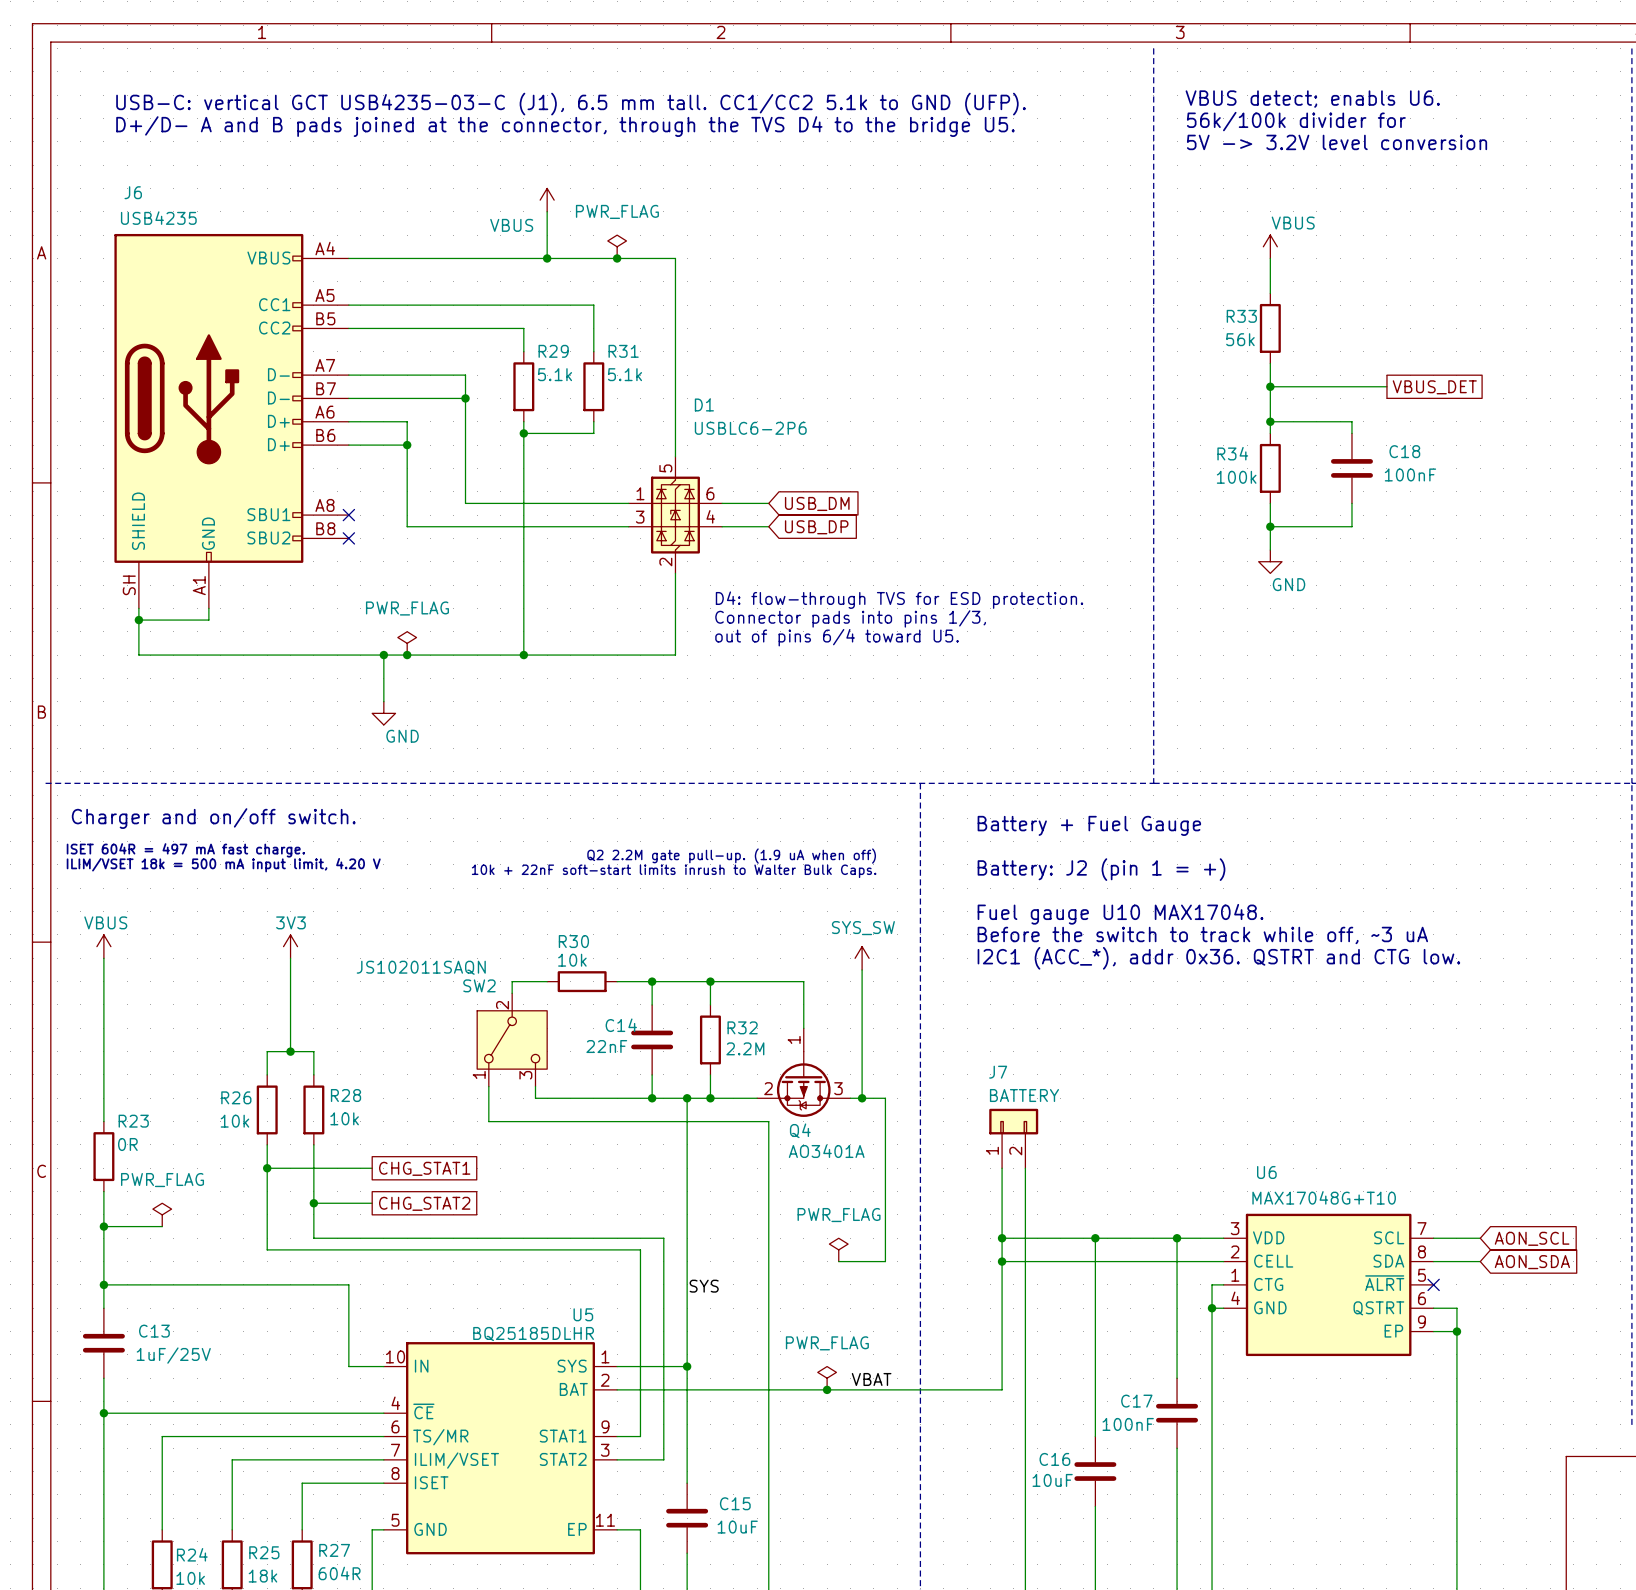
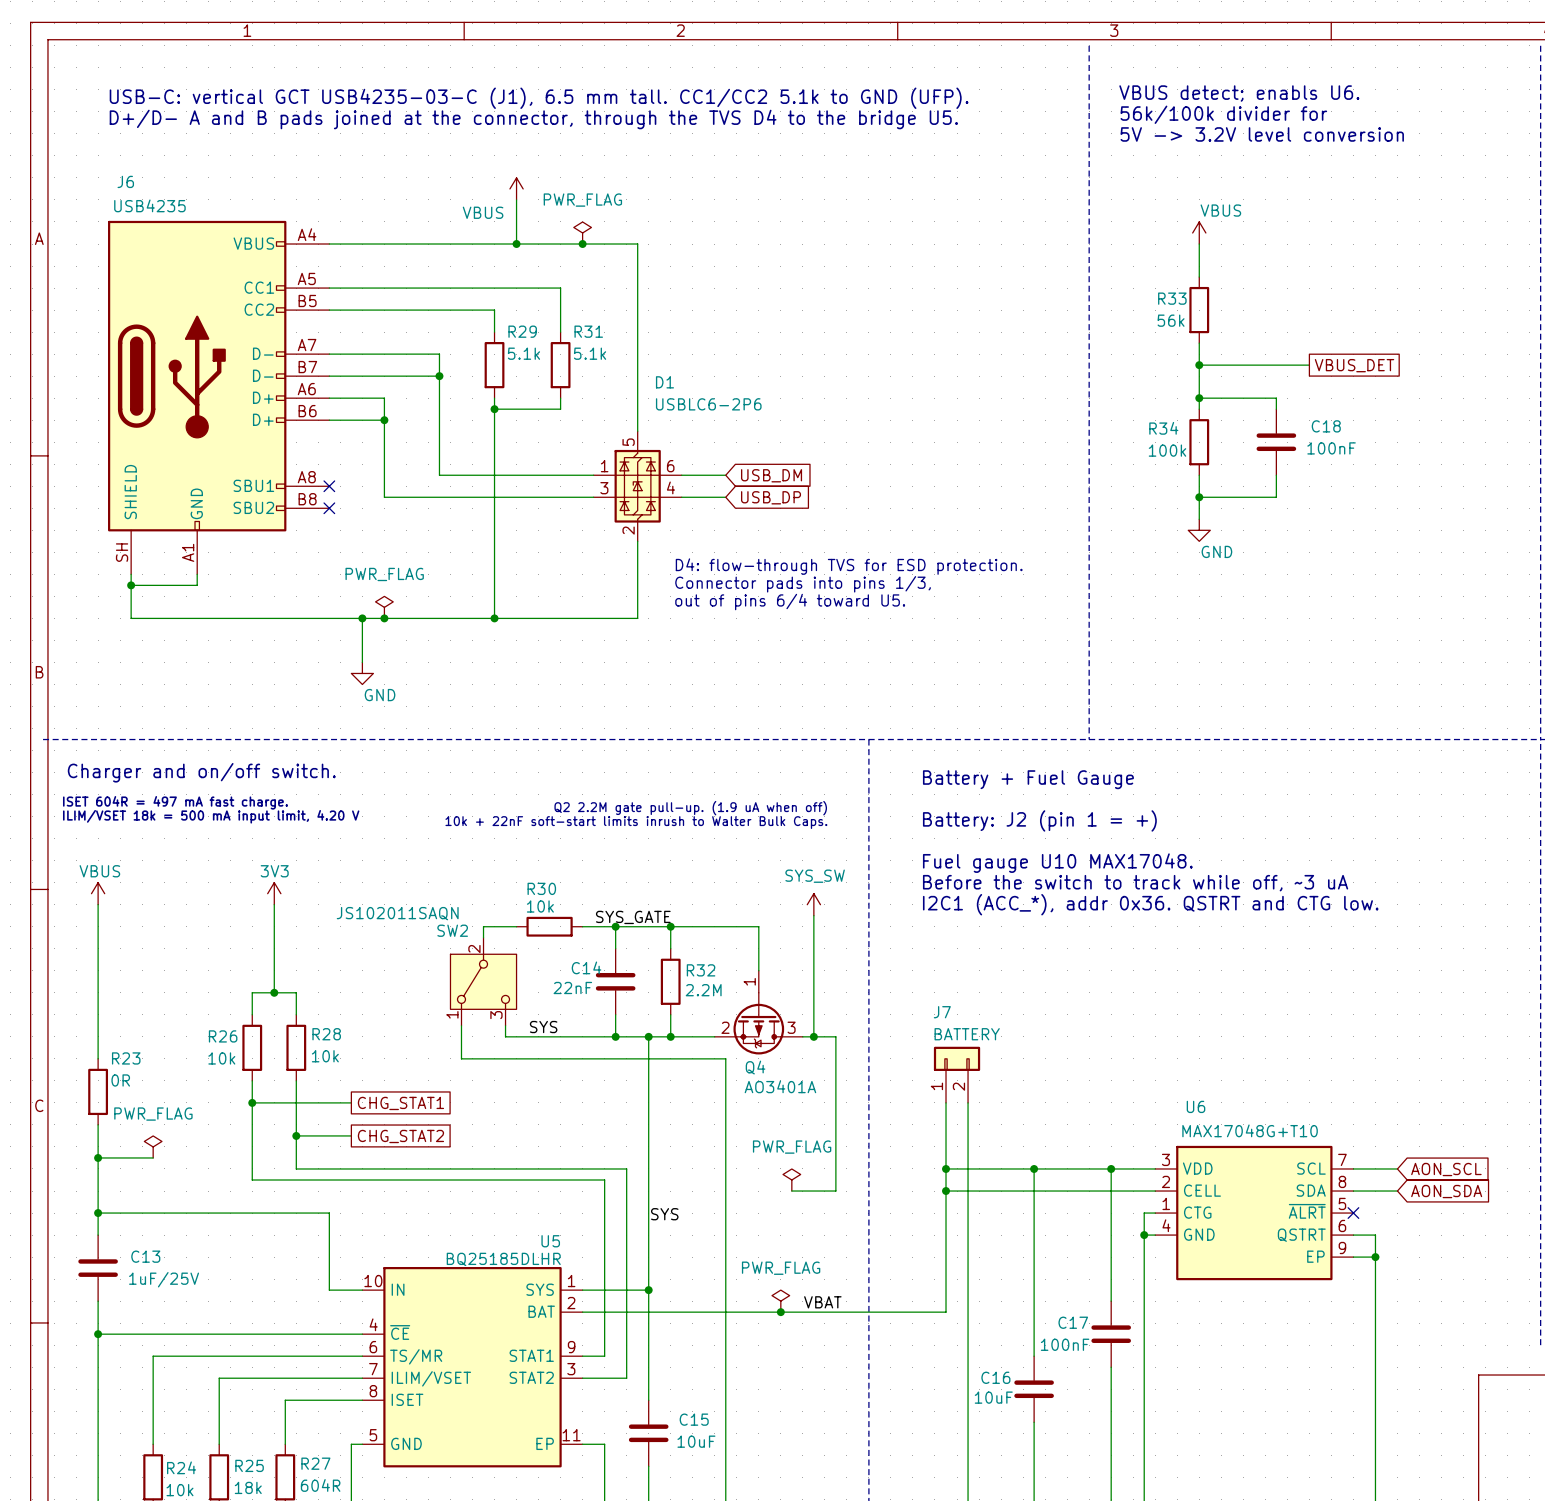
label: none -> SYS_GATE (633, 917)
label: none -> SYS (543, 1027)

